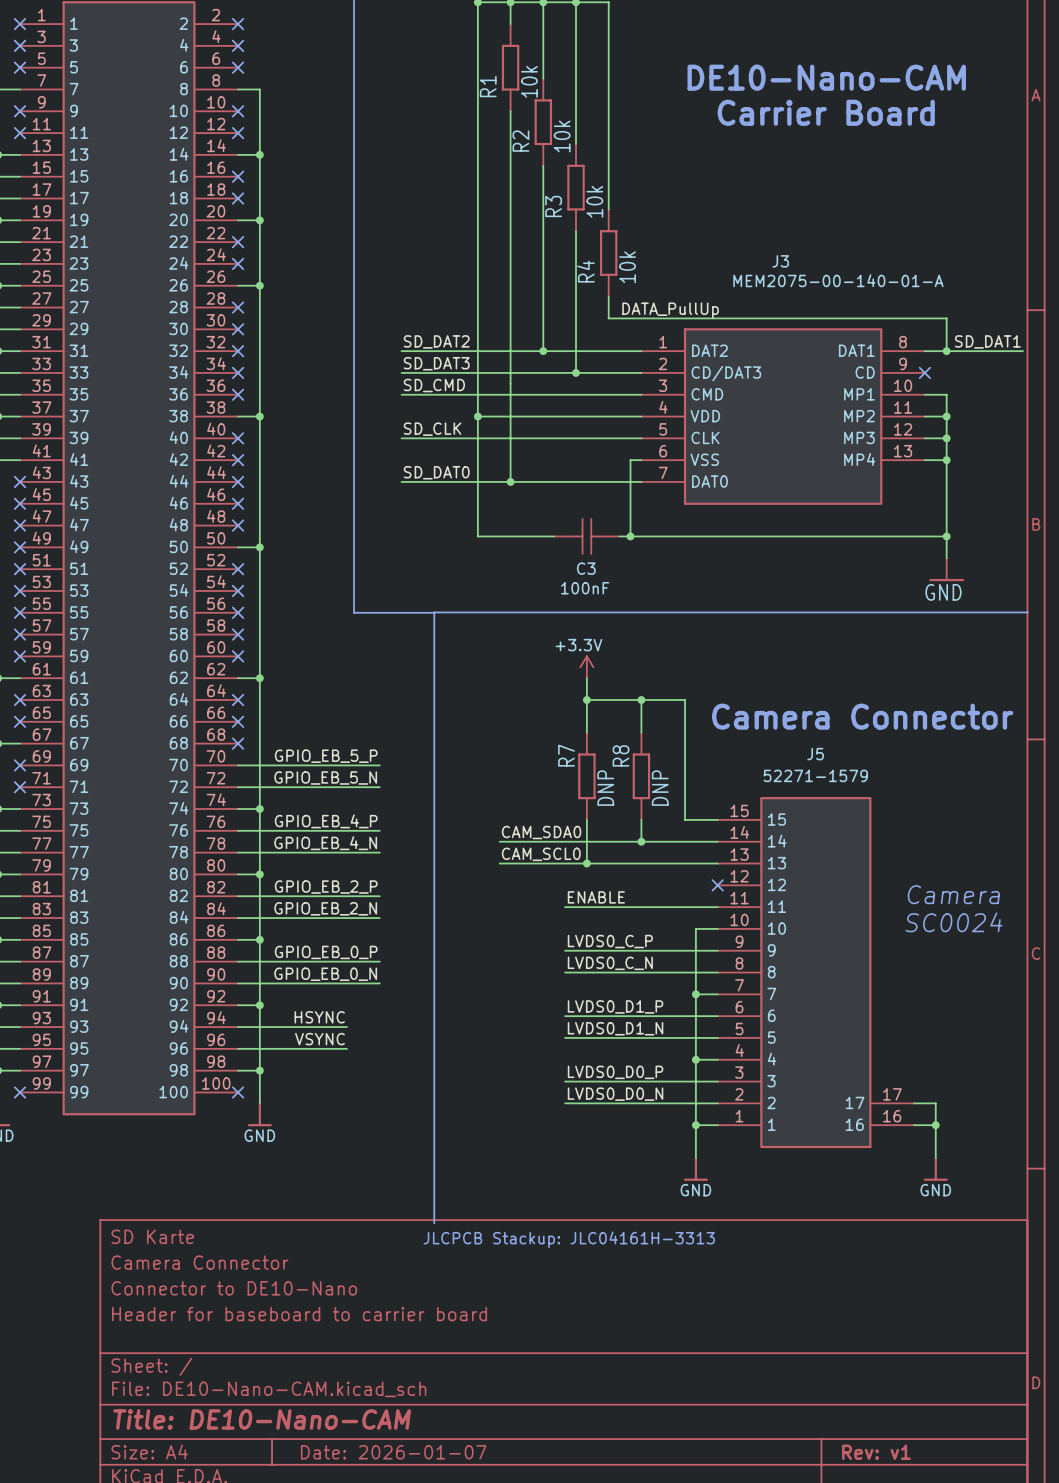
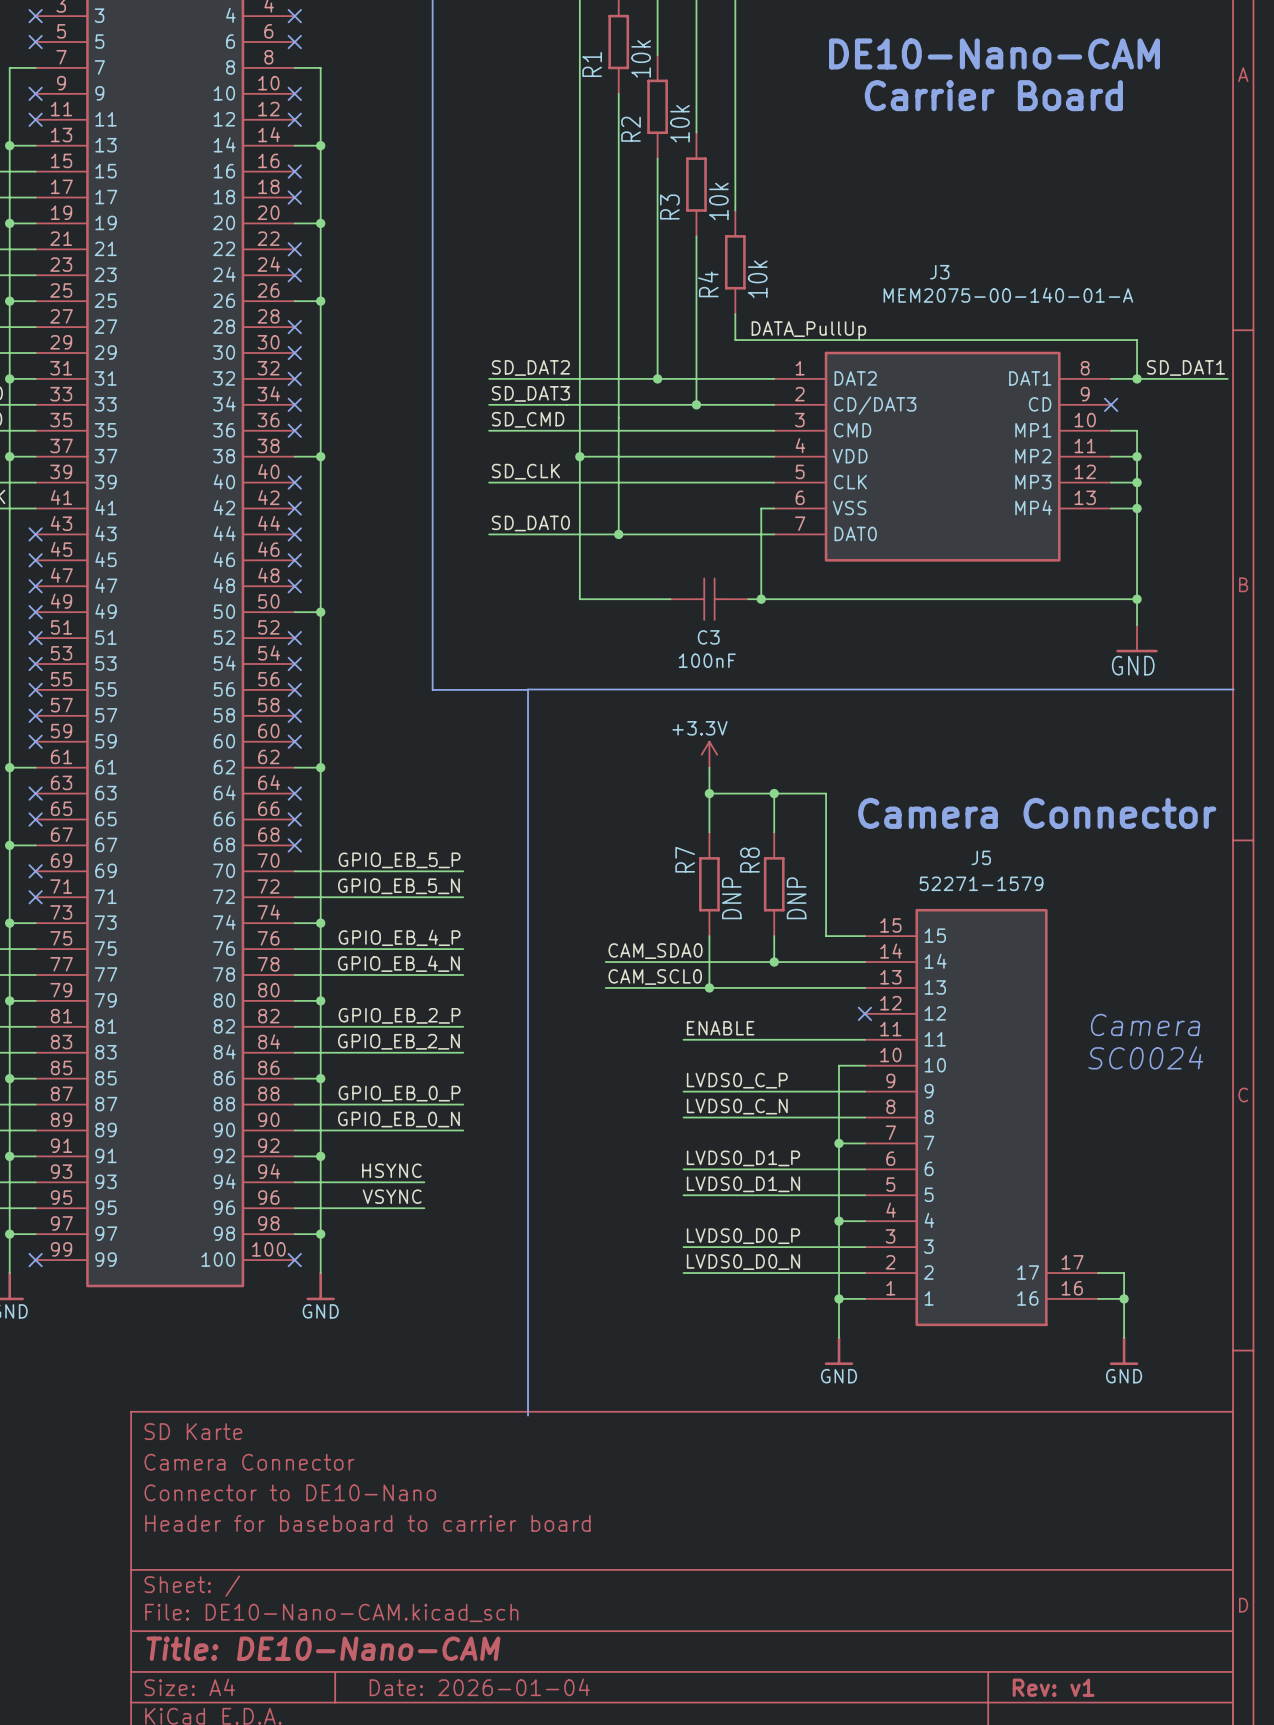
text: JLCPCB Stackup: JLC04161H-3313 (569, 1239) -> none
title block: Date: 2026-01-07 (393, 1452) -> Date: 2026-01-04 (479, 1687)

